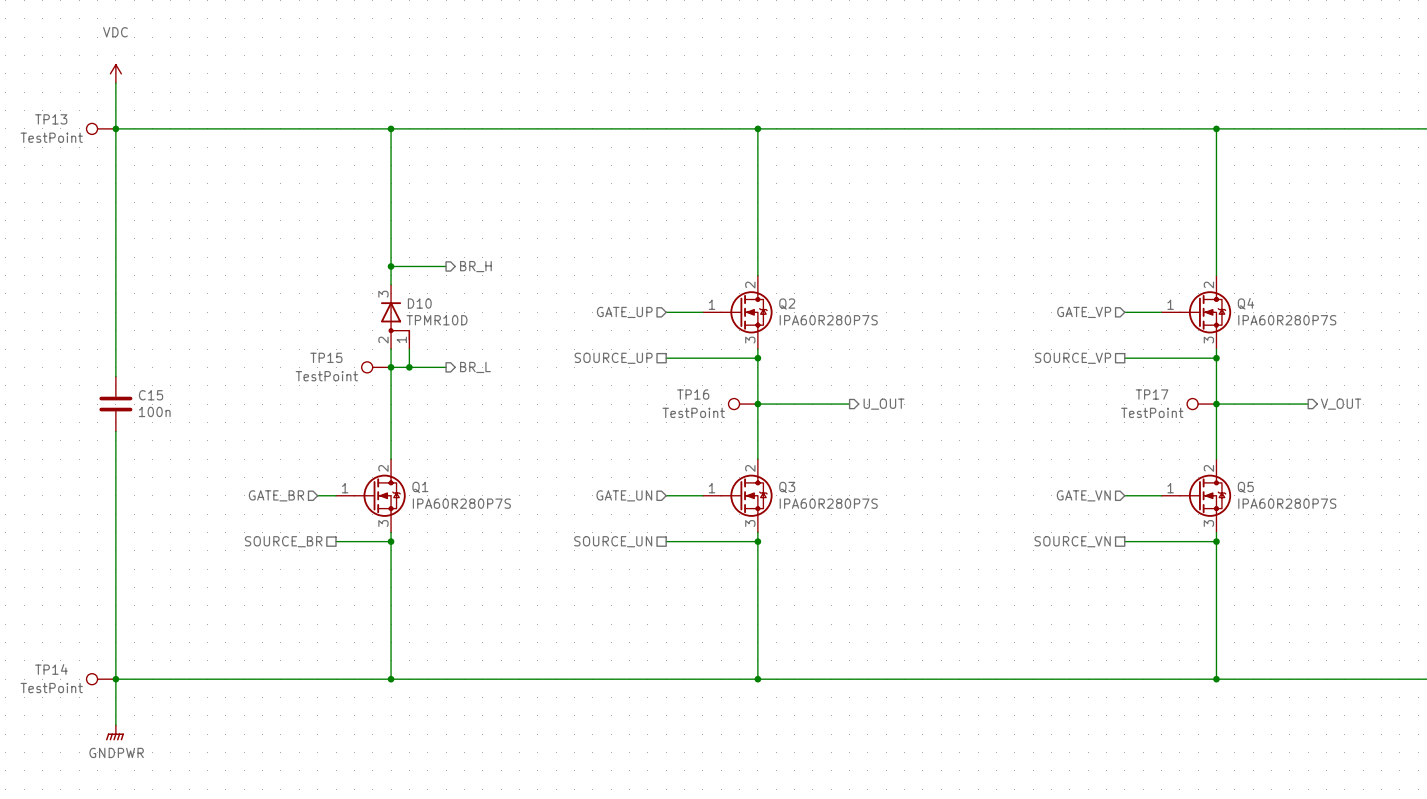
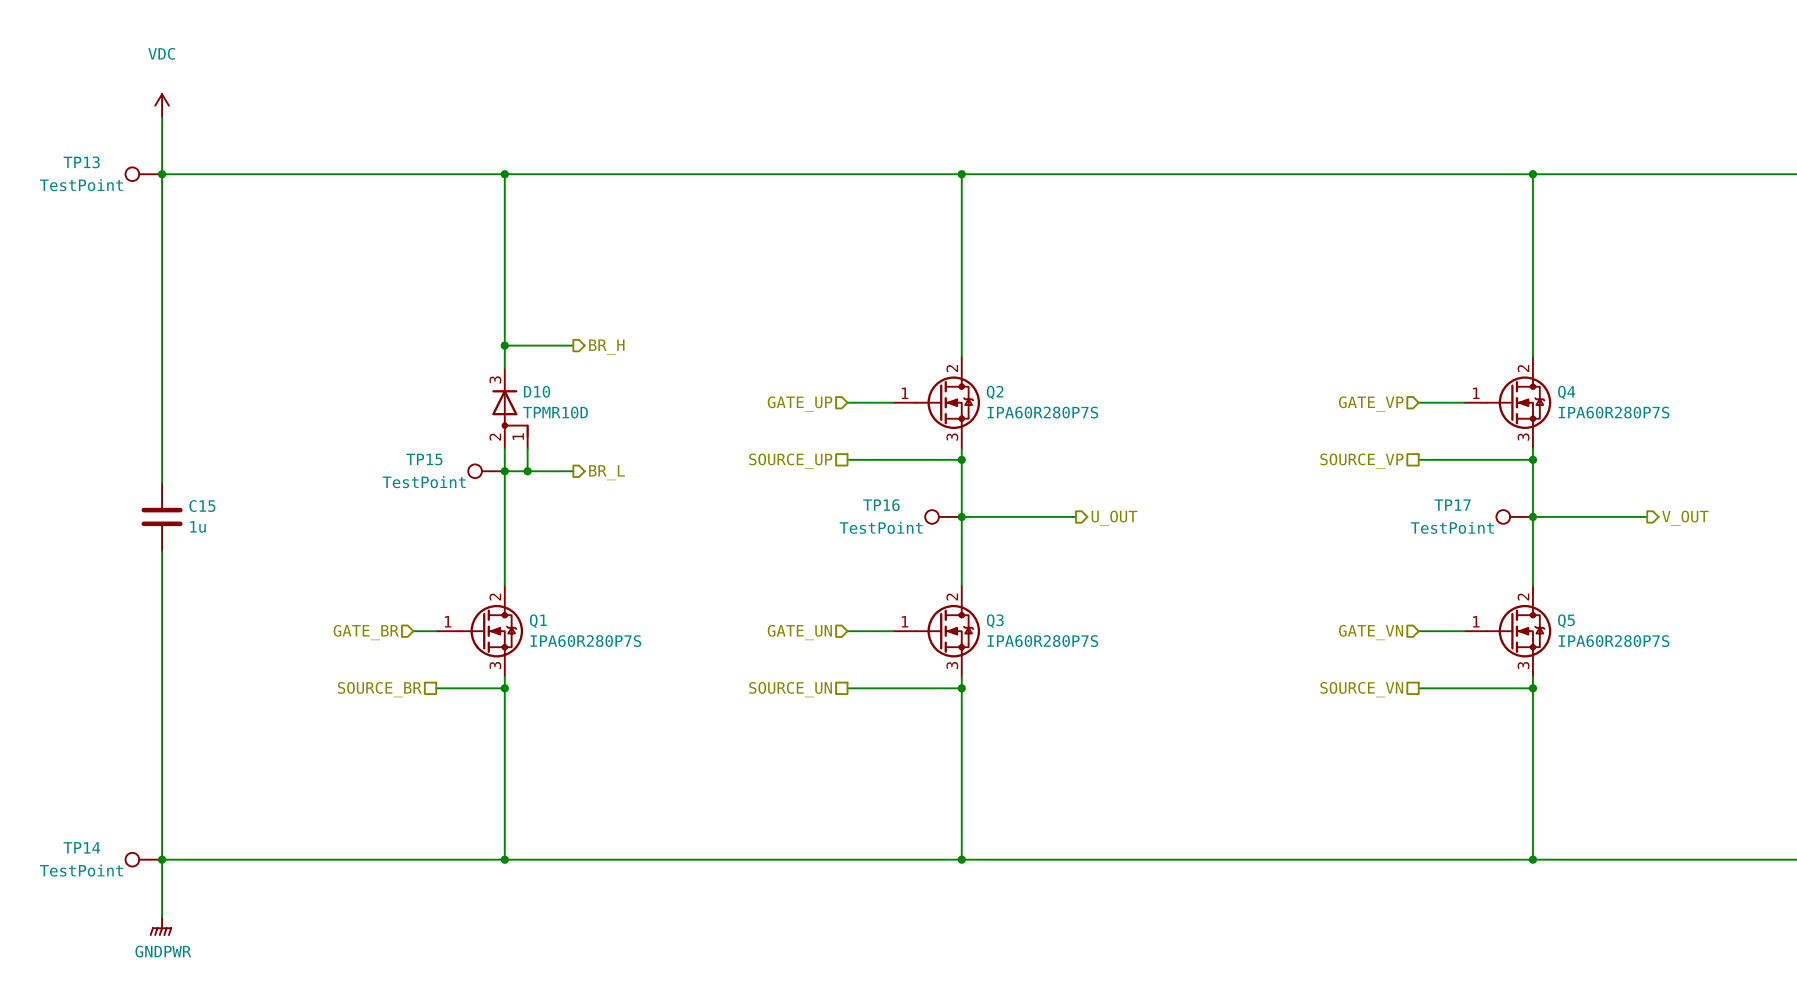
C15 value: 100n (154, 411) -> 1u (198, 526)

